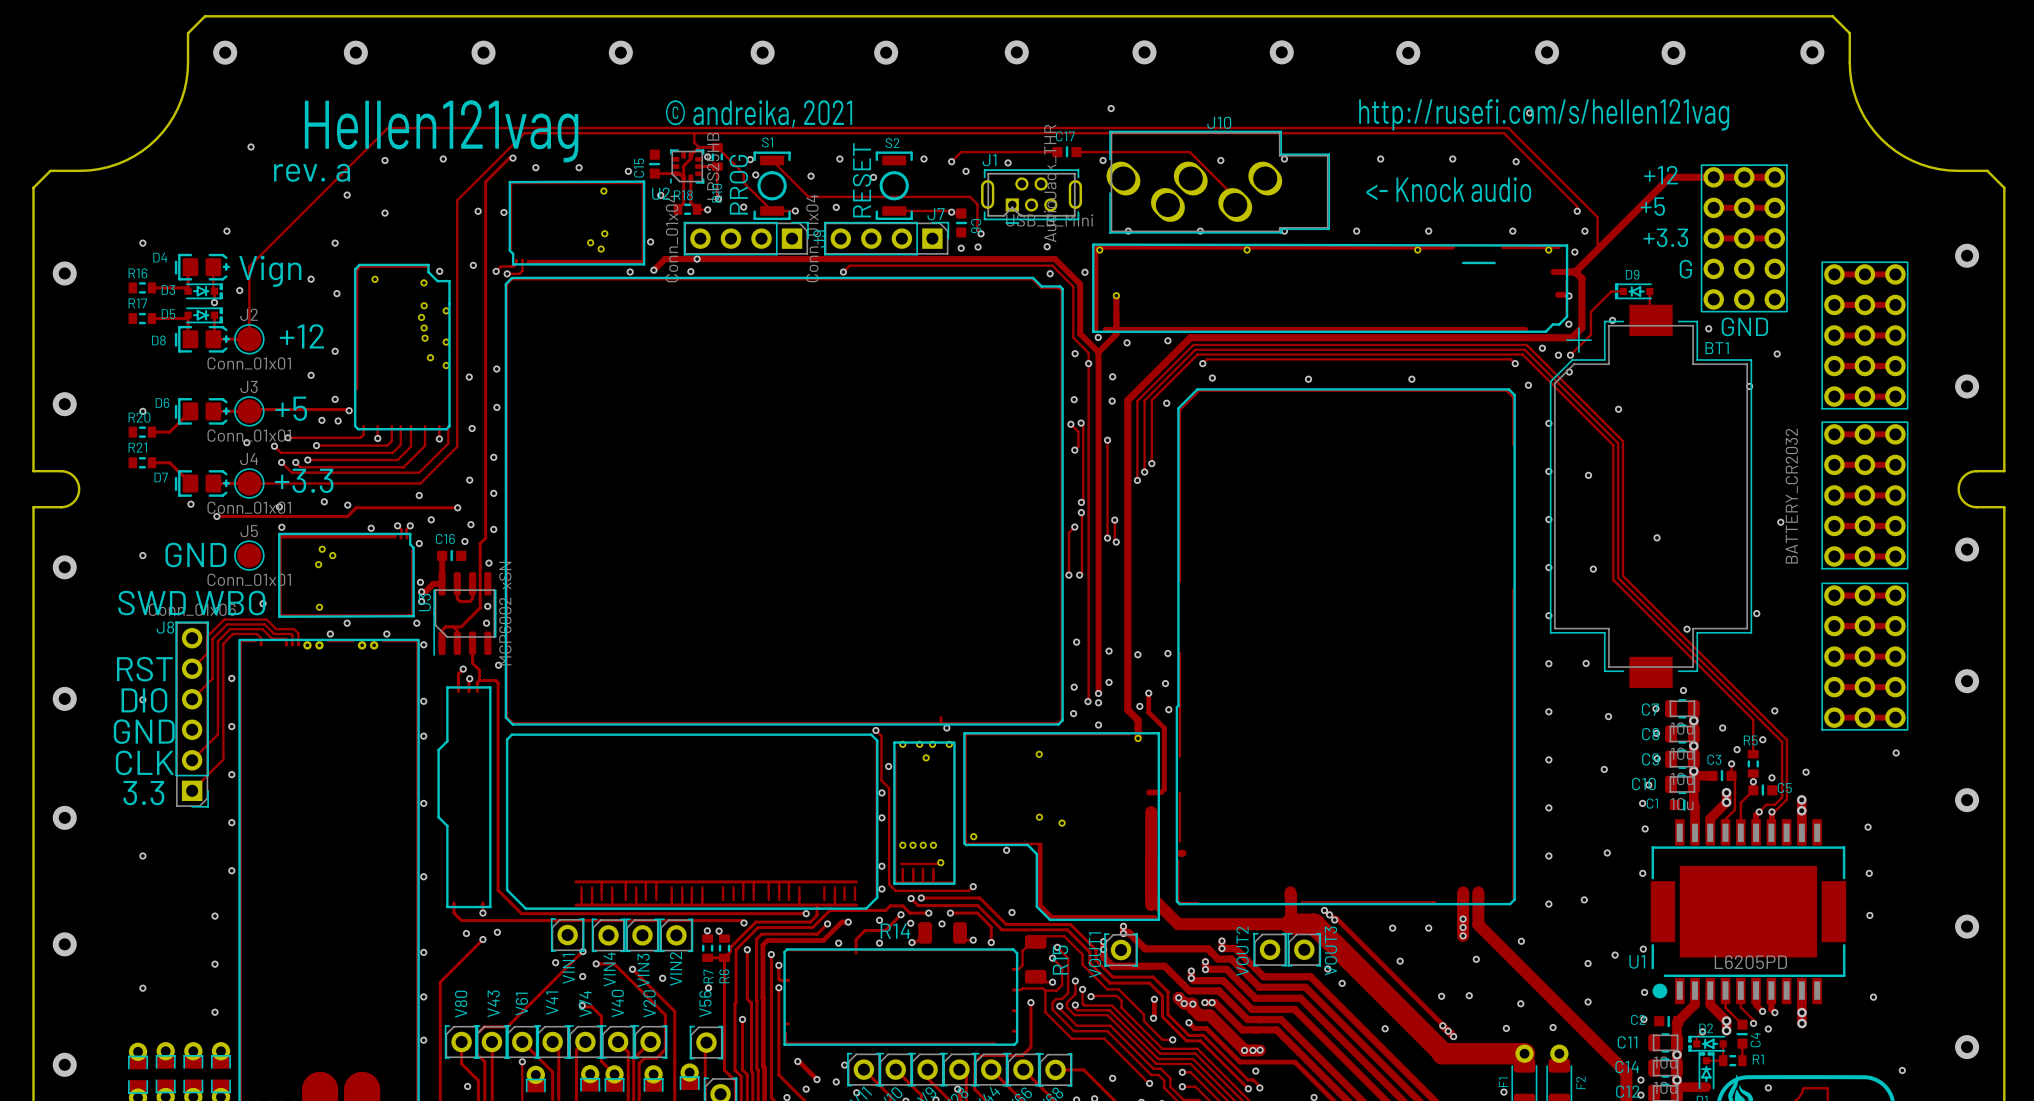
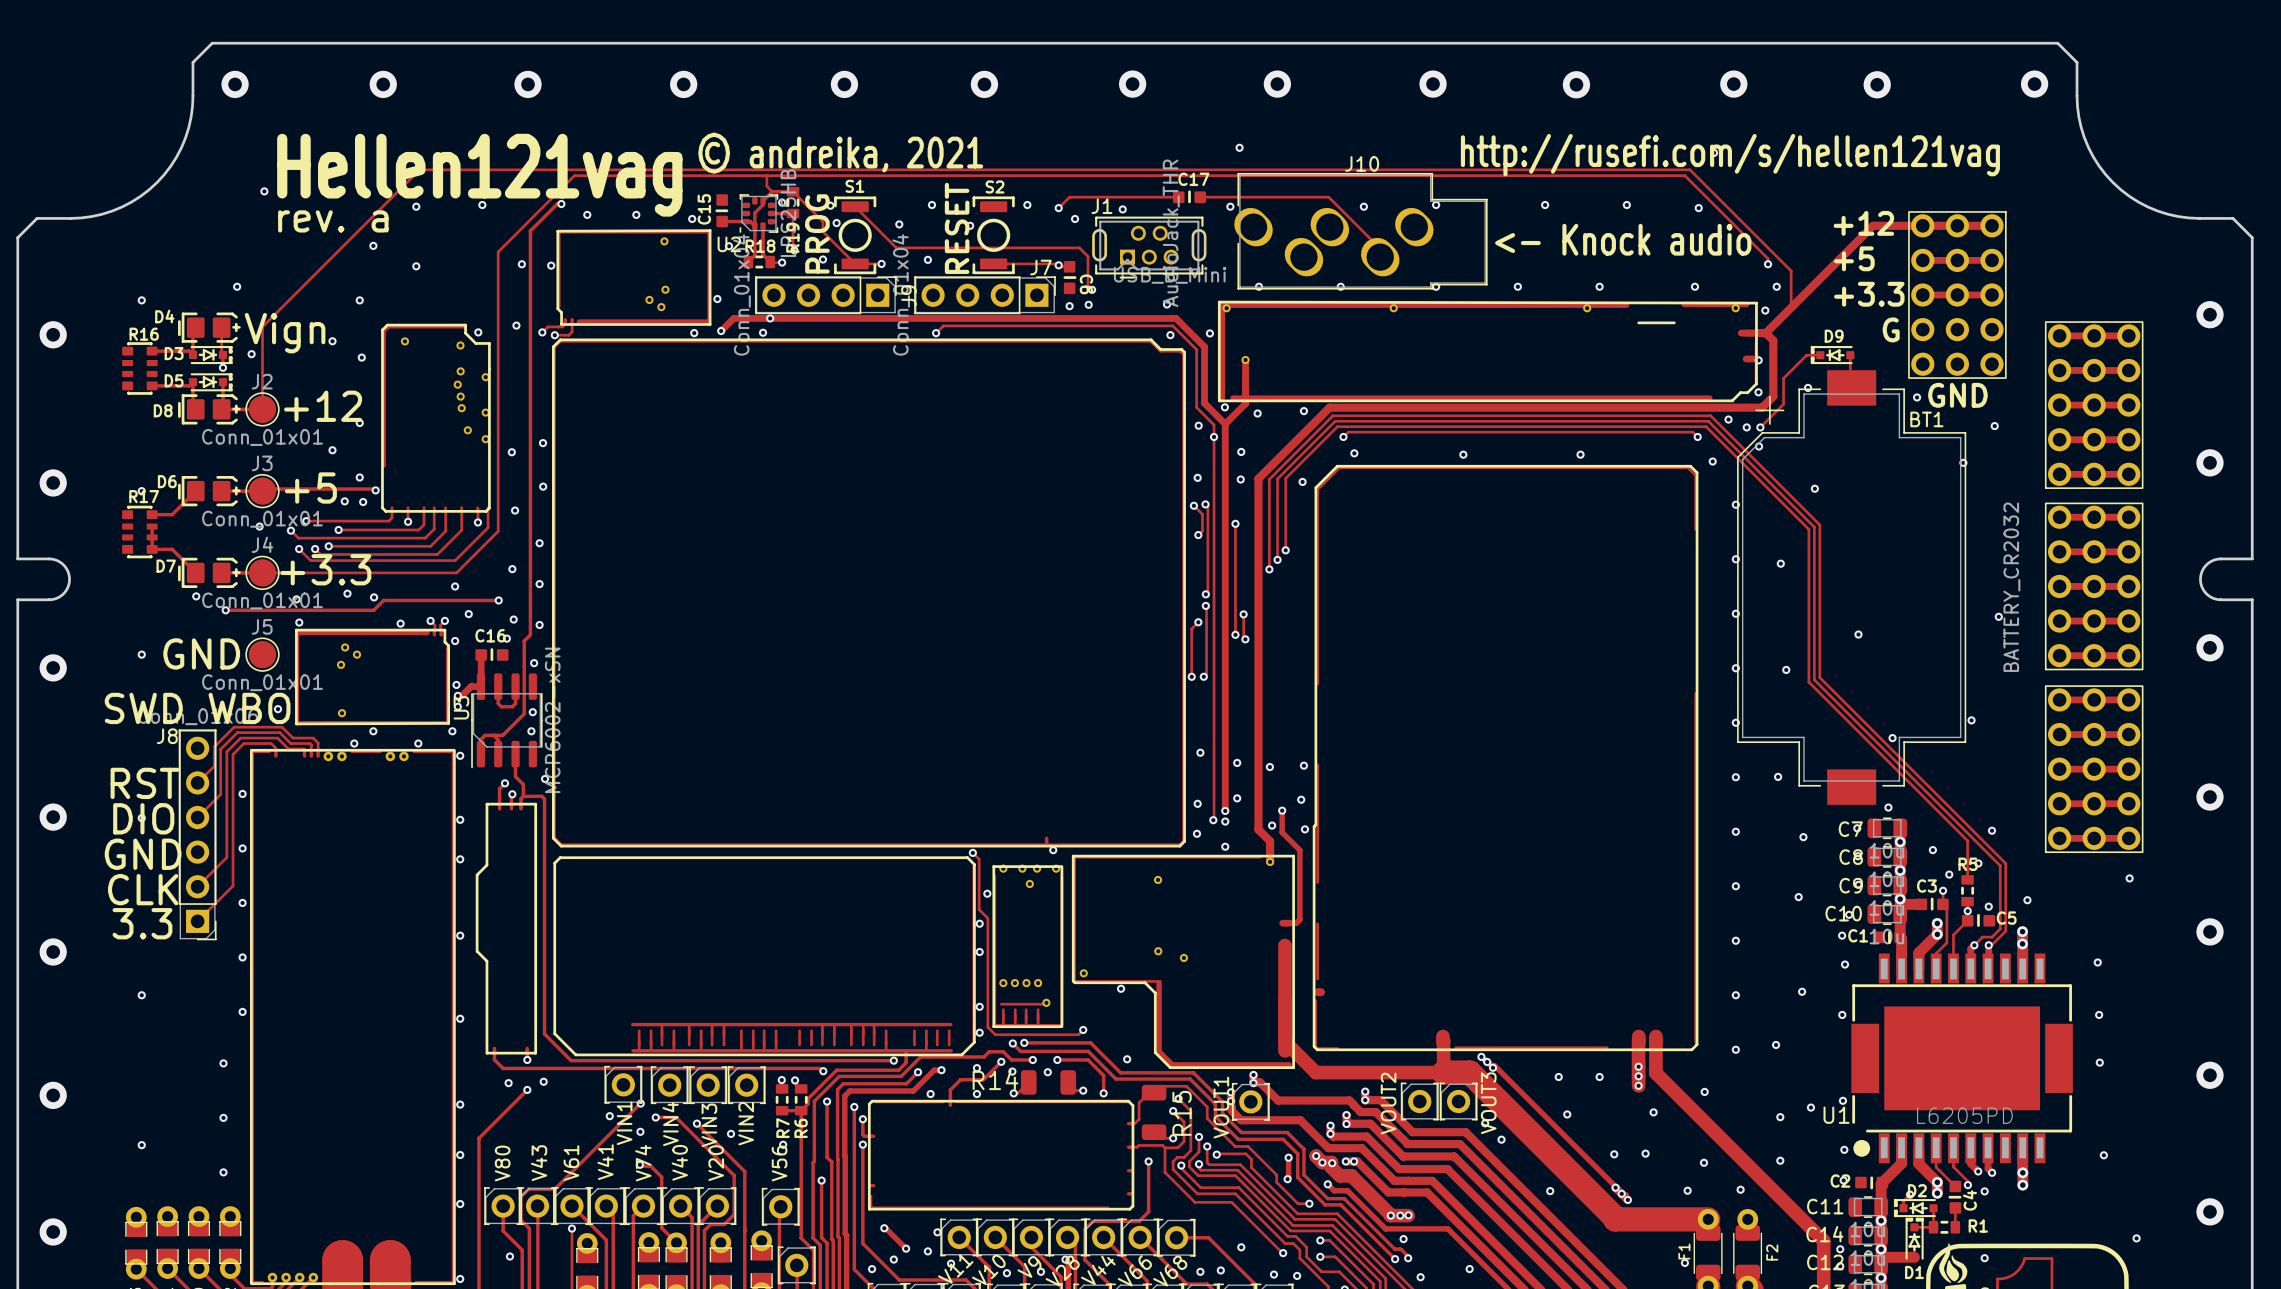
R16 footprint: [128, 282, 157, 294] -> [122, 342, 158, 395]
R17 footprint: [128, 312, 157, 325] -> [122, 505, 158, 559]
R20: (142, 432) -> none
track: none -> (152, 526) (152, 549)
R21: (142, 462) -> none

